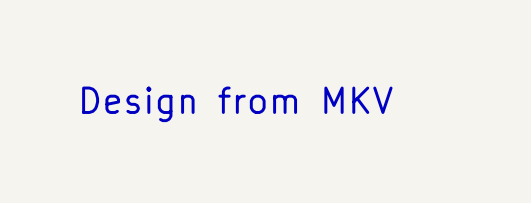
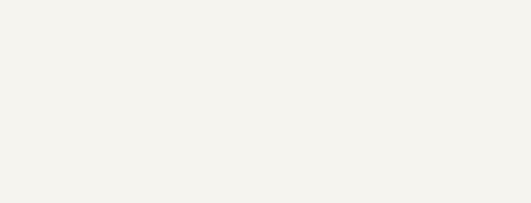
text: Design from MKV (237, 104) -> none

